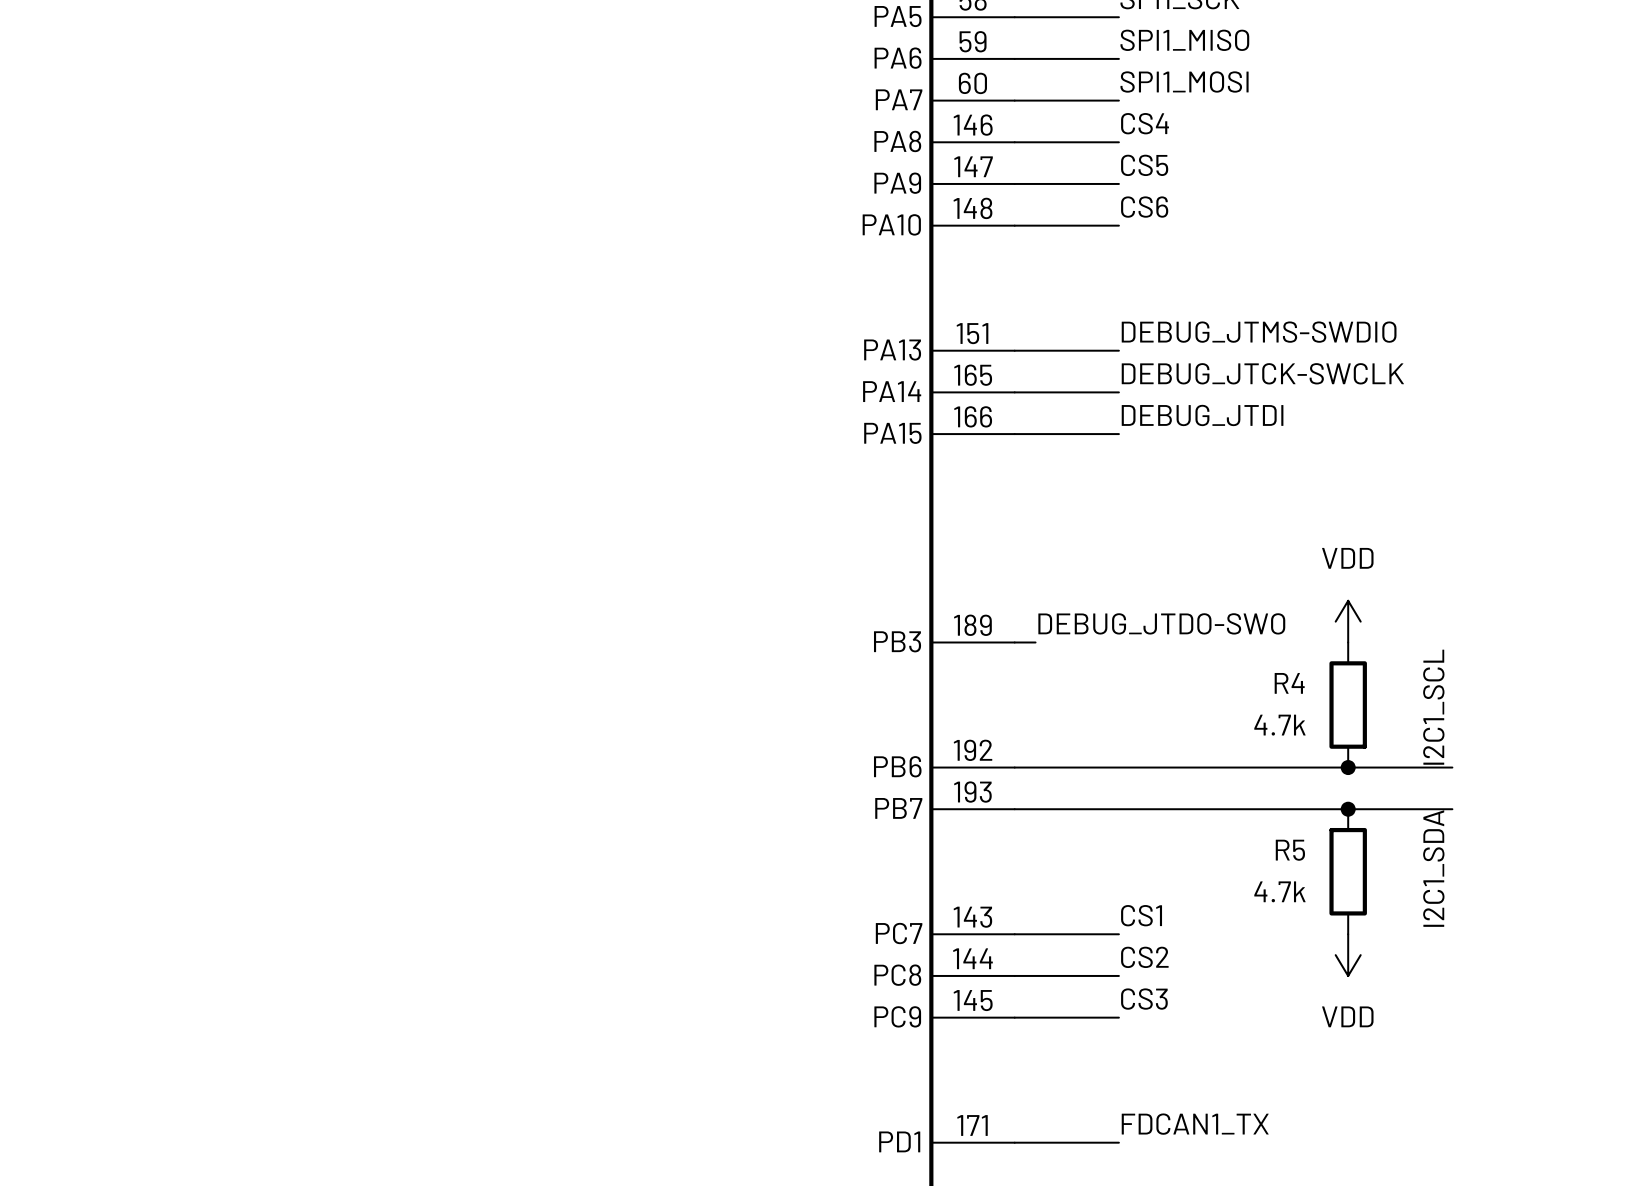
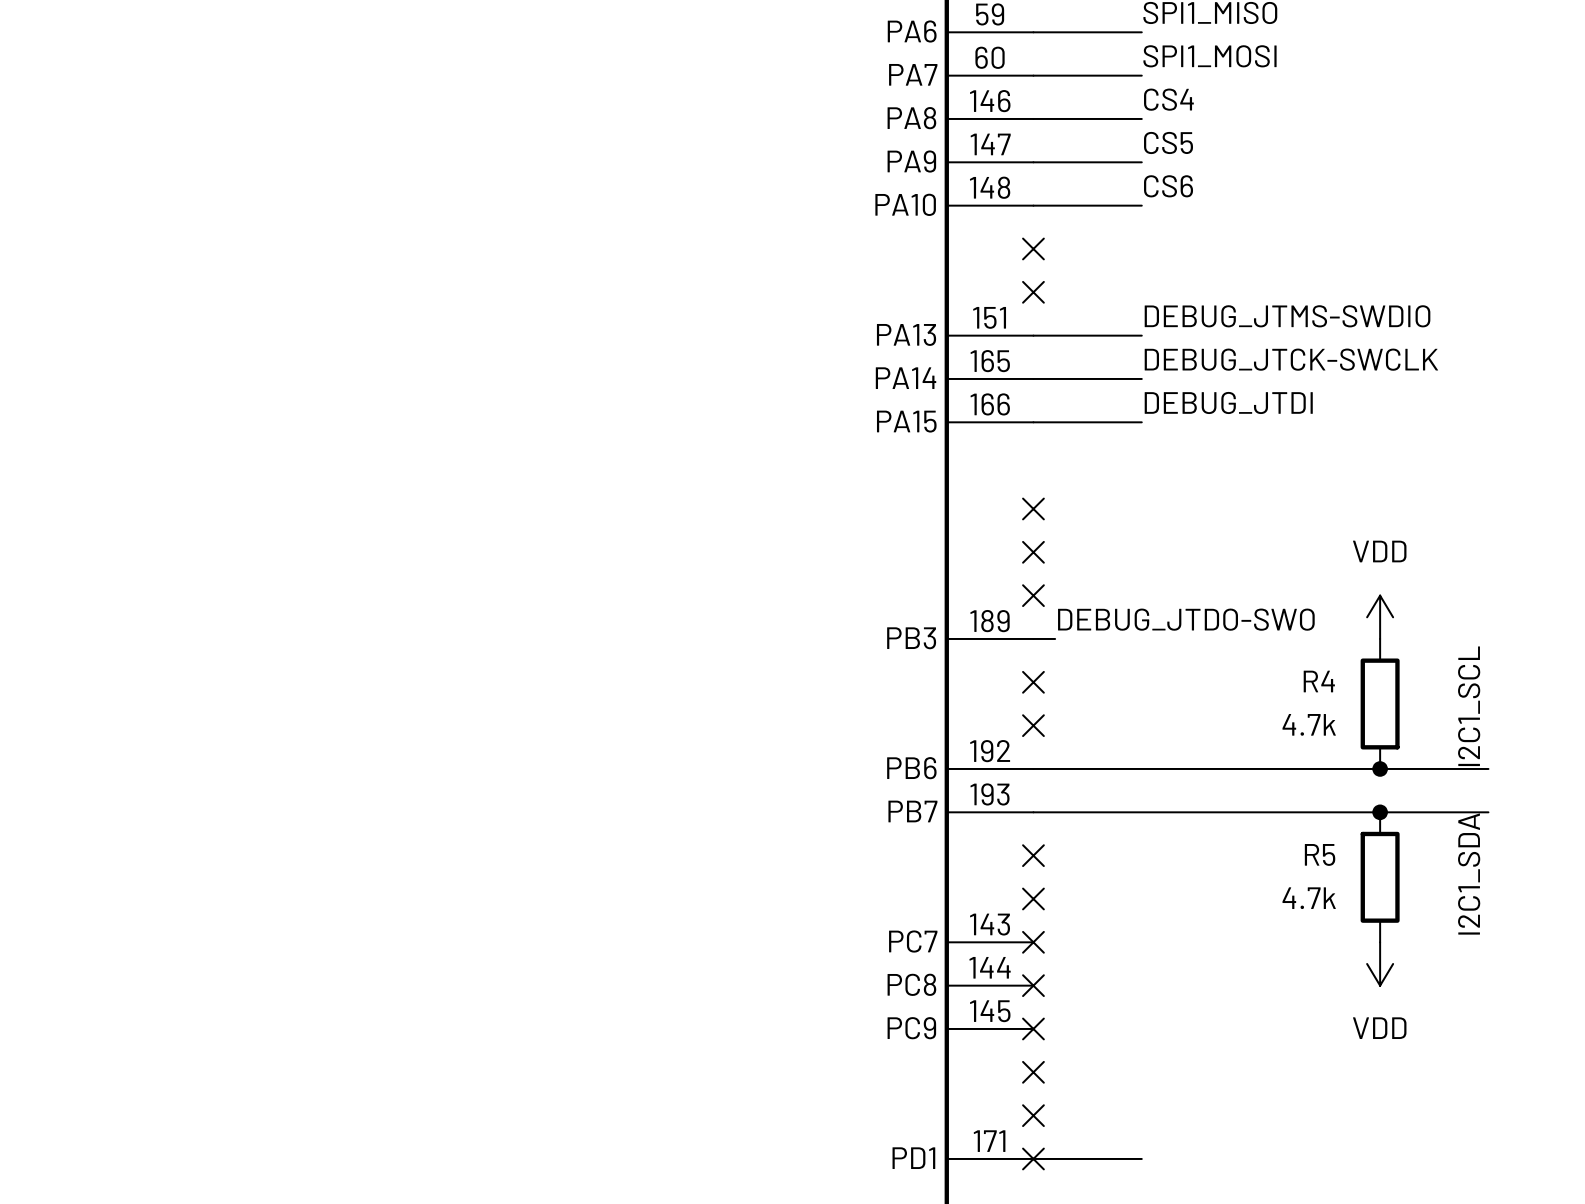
no-connect mark: none -> (1033, 248)
no-connect mark: none -> (1033, 292)
no-connect mark: none -> (1033, 508)
no-connect mark: none -> (1033, 552)
no-connect mark: none -> (1033, 595)
no-connect mark: none -> (1033, 682)
no-connect mark: none -> (1033, 725)
no-connect mark: none -> (1033, 855)
no-connect mark: none -> (1033, 898)
label: CS1 (1141, 915) -> none
wire: (1014, 934) (1118, 934) -> none
no-connect mark: none -> (1033, 942)
label: CS2 (1144, 957) -> none
wire: (1014, 975) (1118, 975) -> none
no-connect mark: none -> (1033, 985)
label: CS3 (1144, 999) -> none
wire: (1014, 1017) (1118, 1017) -> none
no-connect mark: none -> (1033, 1028)
no-connect mark: none -> (1033, 1072)
no-connect mark: none -> (1033, 1115)
label: FDCAN1_TX (1195, 1124) -> none
no-connect mark: none -> (1033, 1158)

